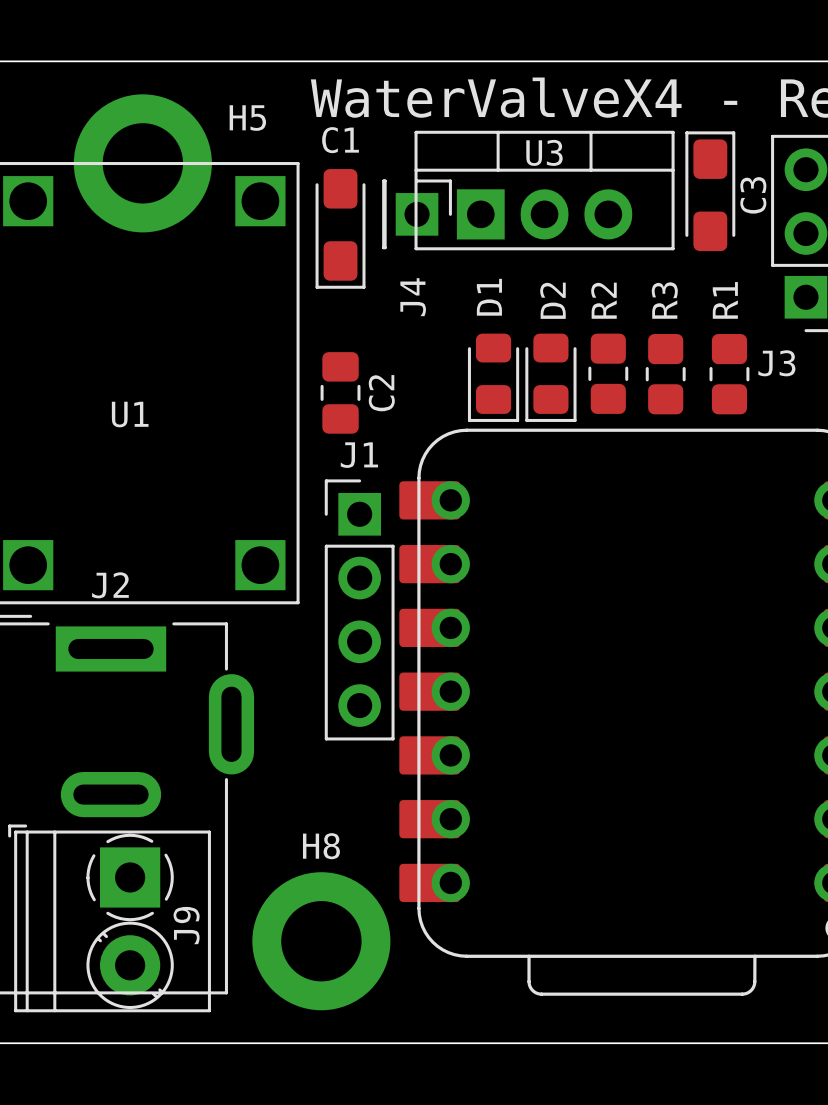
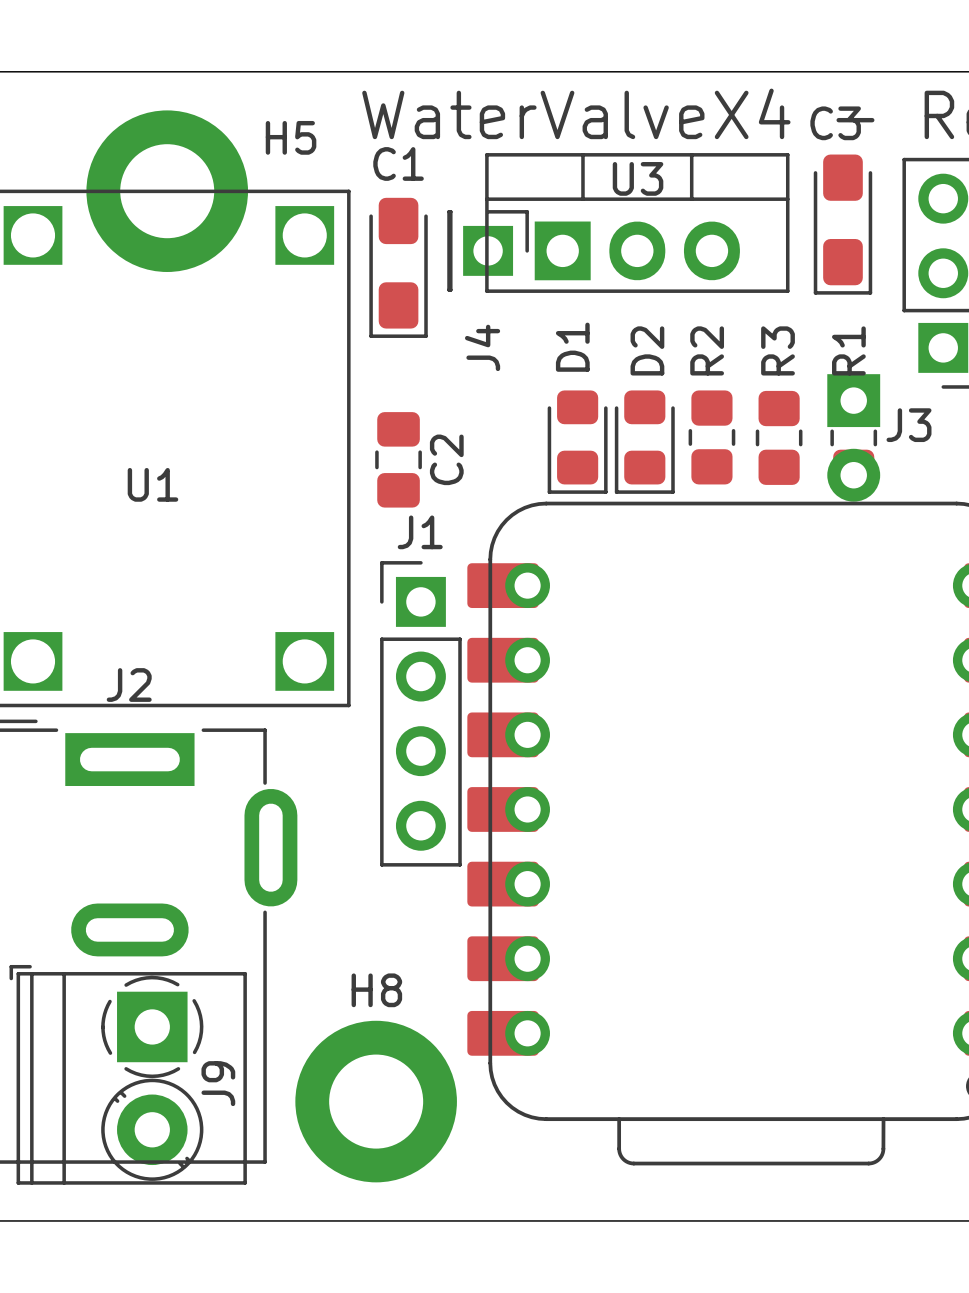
C3 rotation: 0° (710, 191) -> 180° (842, 224)
C3 name position: C3 (753, 195) -> C3 (835, 123)
part: none -> (853, 437)

